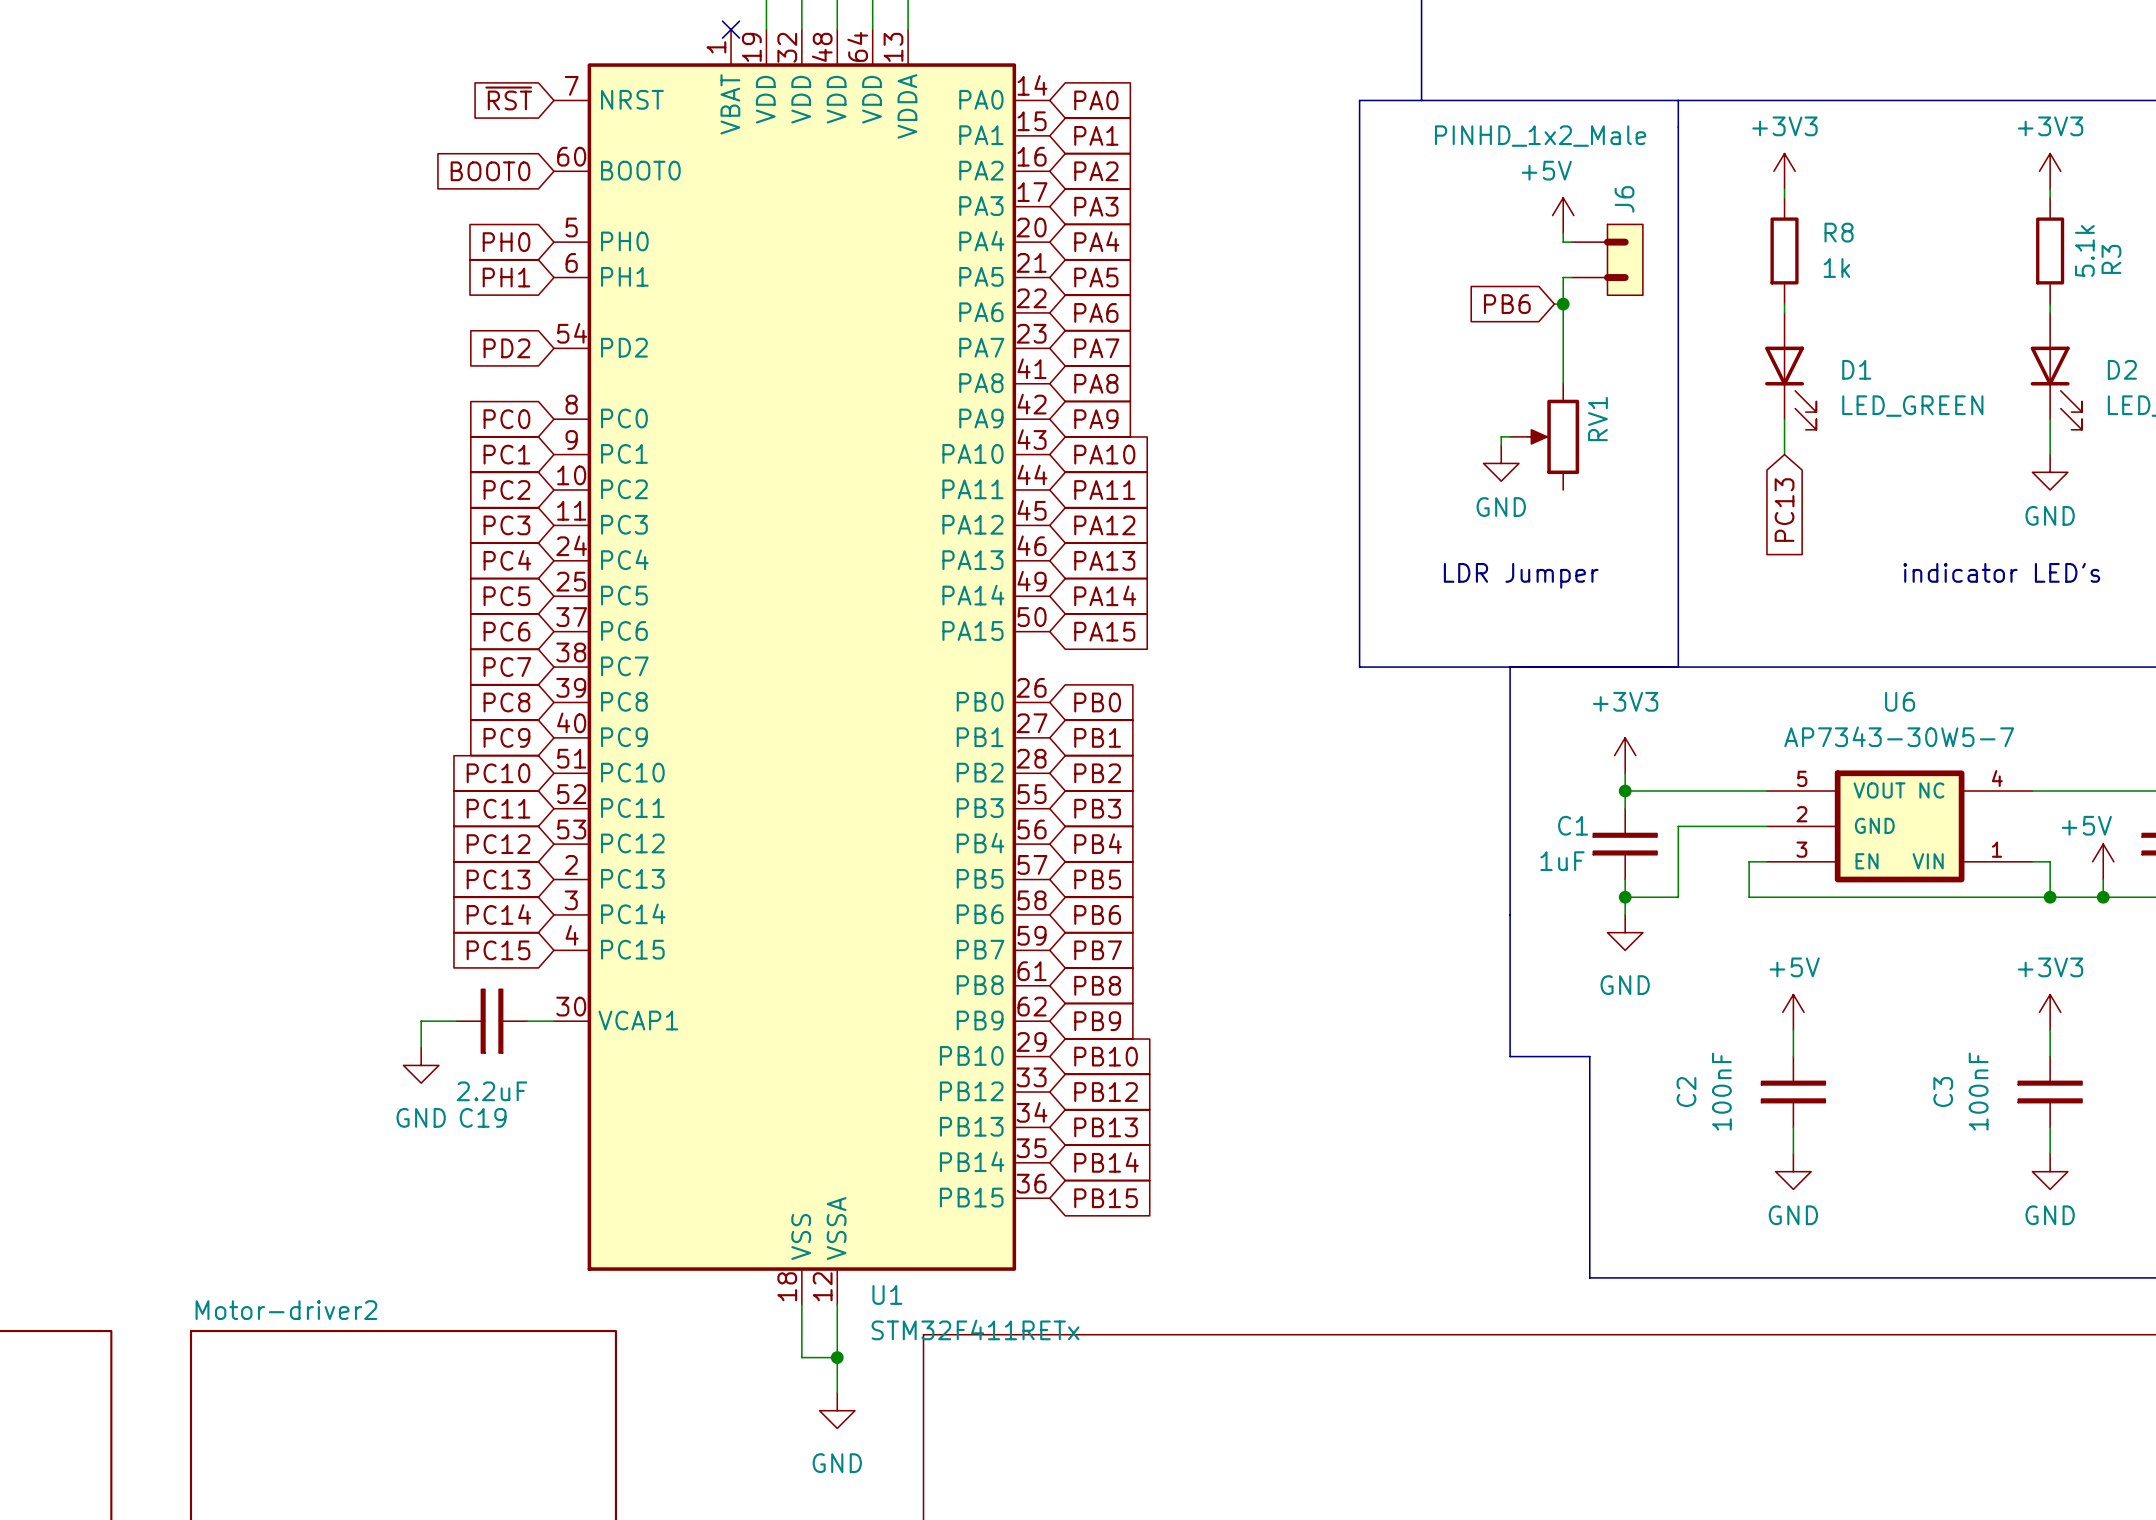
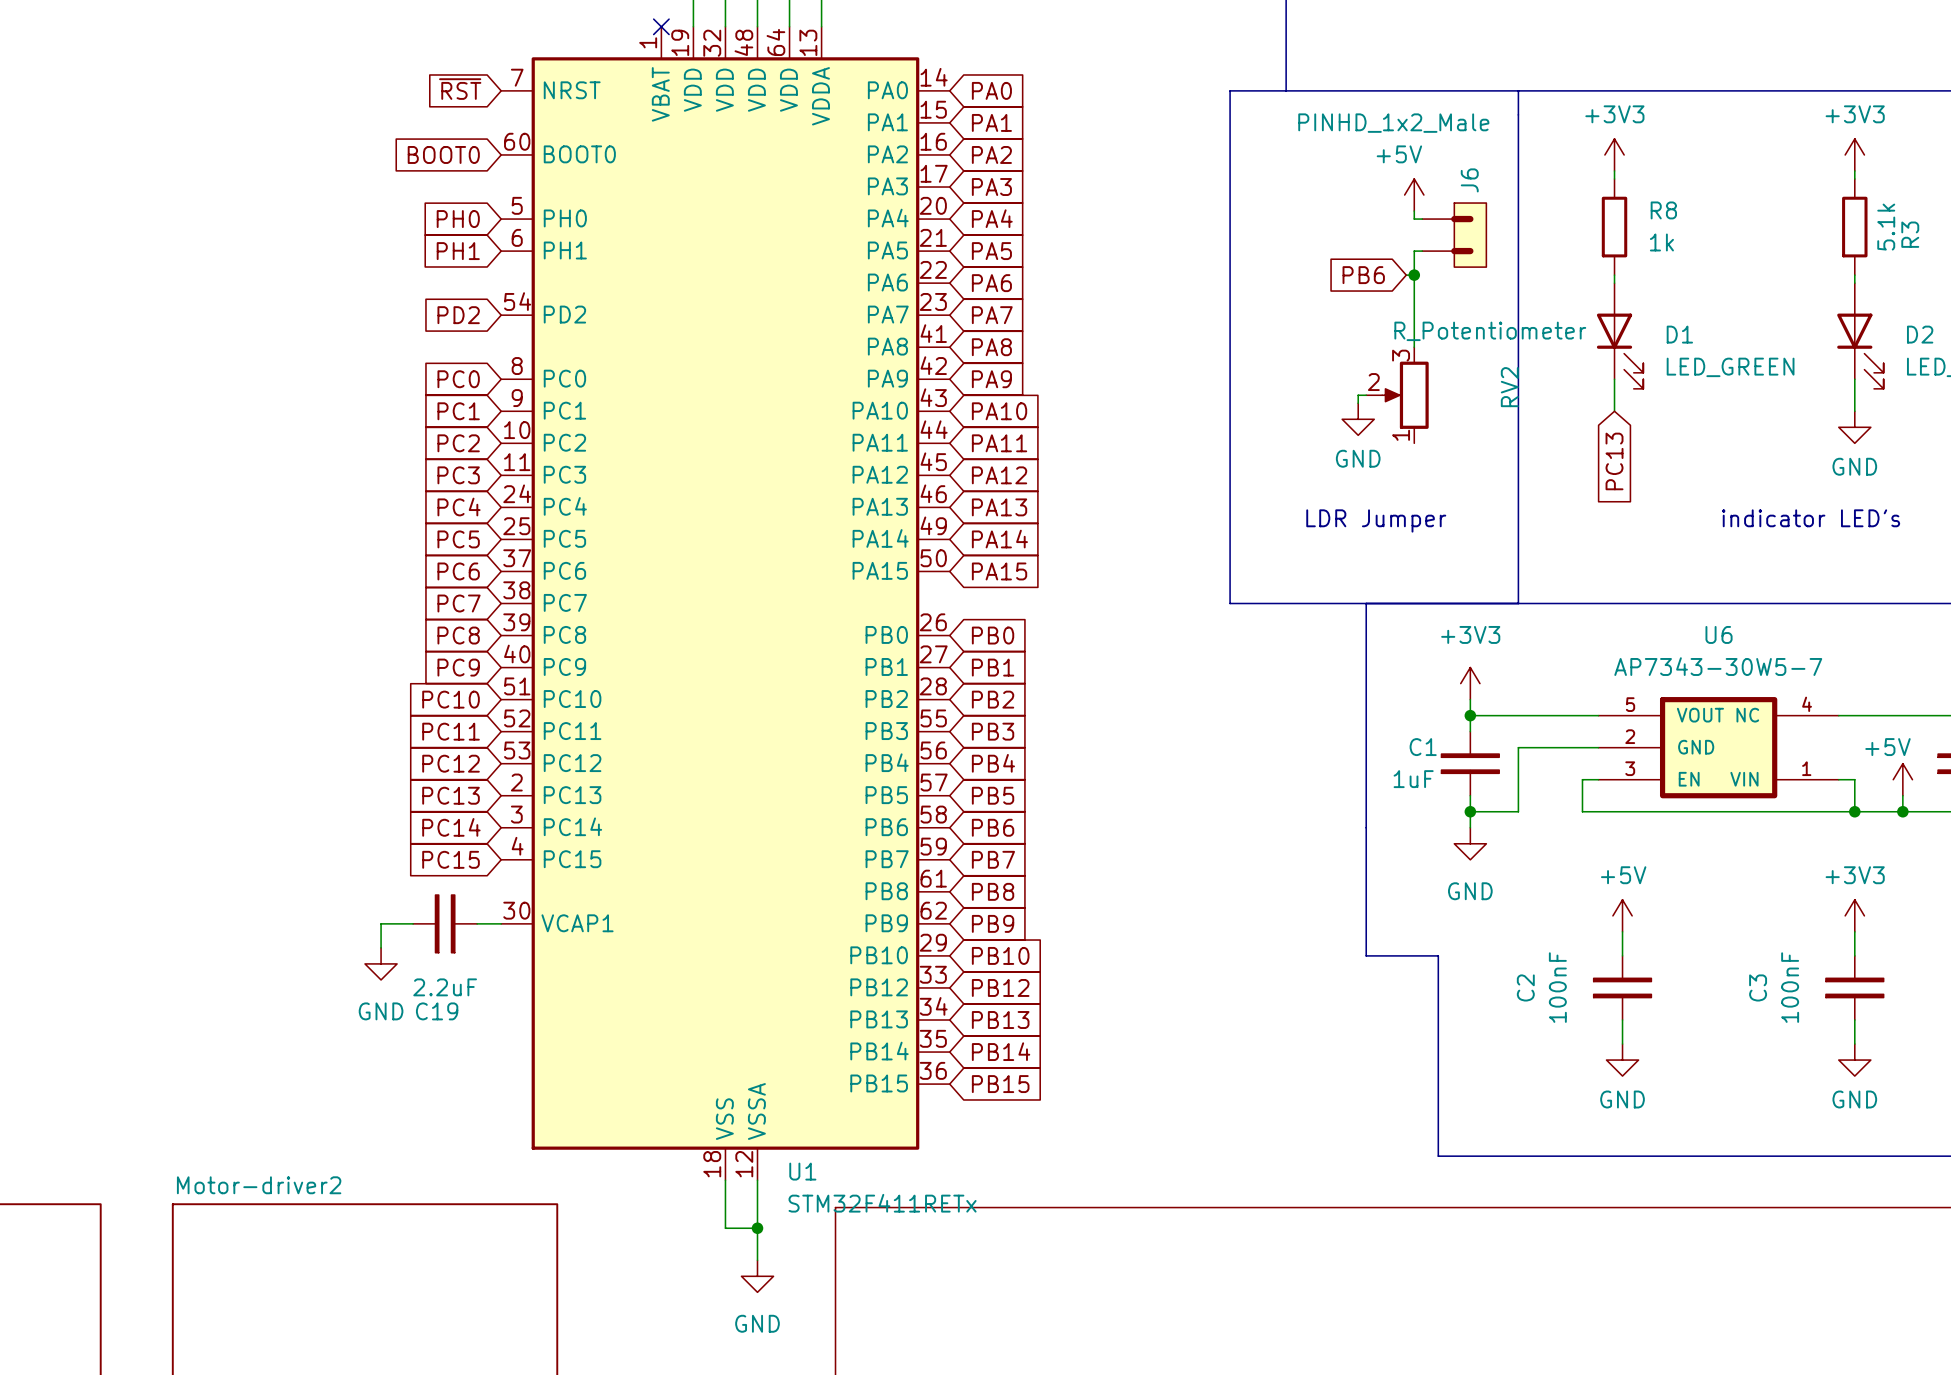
RV1 value: none -> R_Potentiometer (1490, 331)
RV1 pin number: none -> 3 (1401, 355)
RV1 name: RV1 (1597, 419) -> RV2 (1509, 387)
RV1 pin number: none -> 2 (1373, 382)
RV1 pin number: none -> 1 (1401, 435)

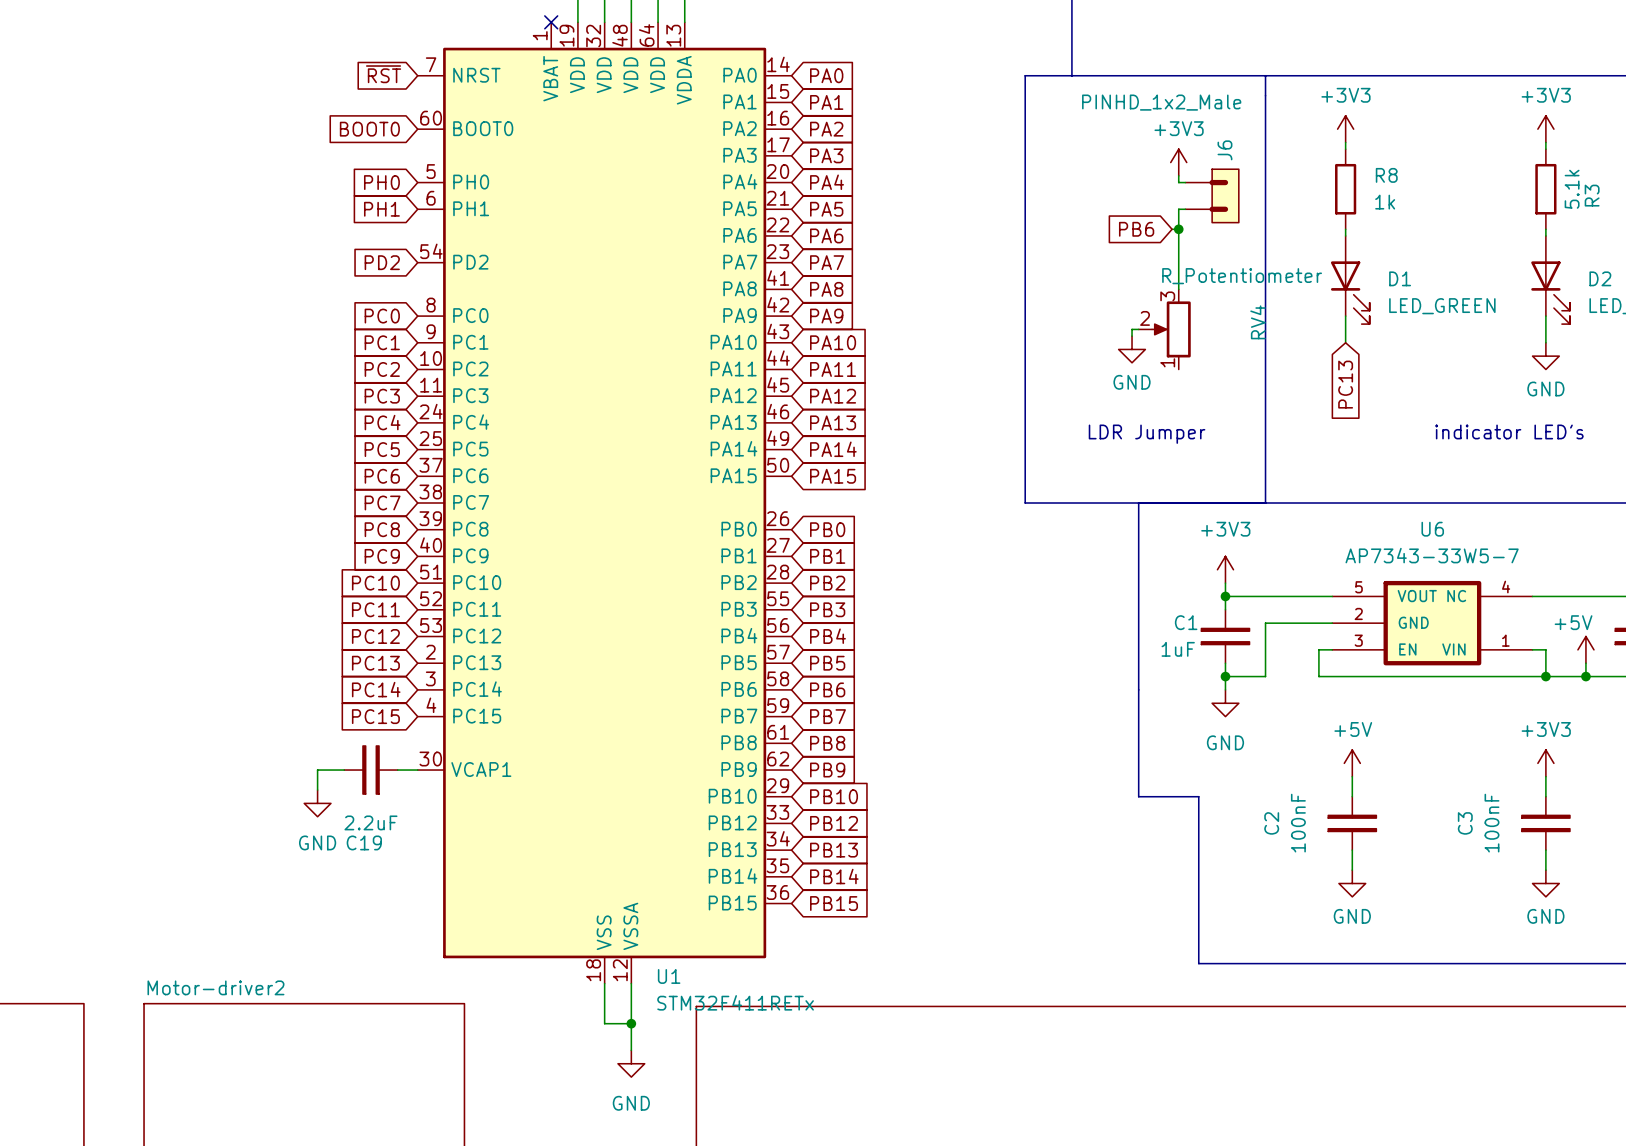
power symbol: +5V (1414, 195) -> +3V3 (1178, 162)
RV2 name: RV2 (1509, 387) -> RV4 (1258, 322)
U6 value: AP7343-30W5-7 (1718, 666) -> AP7343-33W5-7 (1432, 555)

